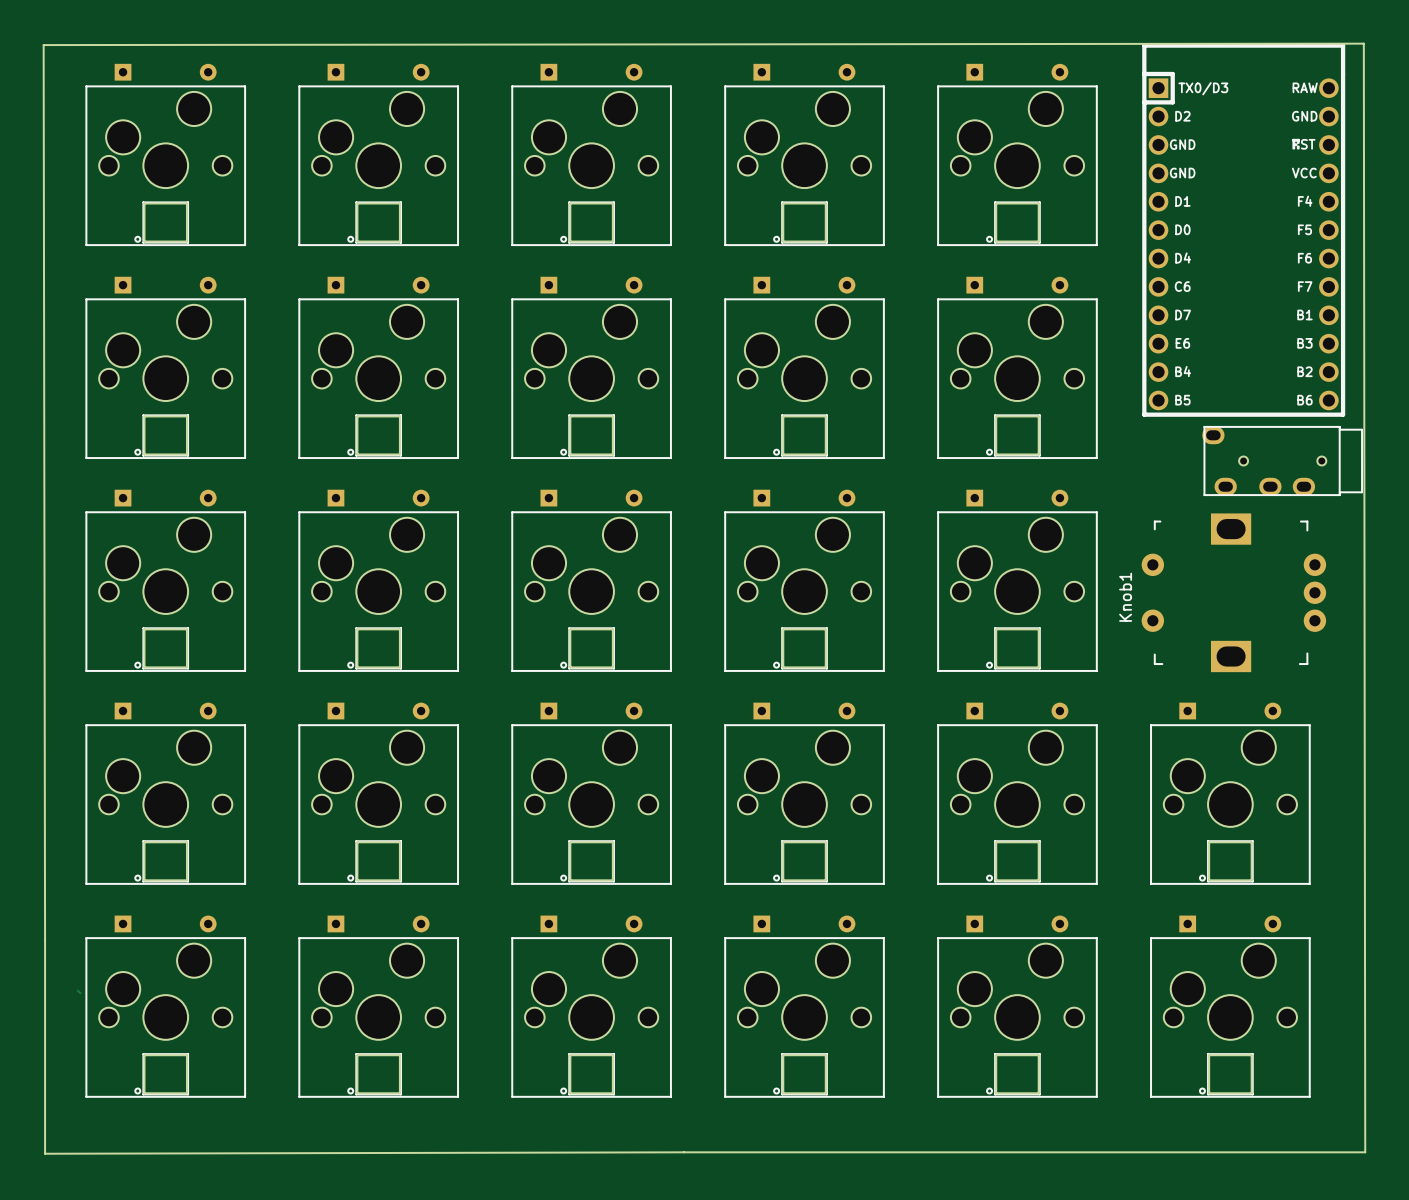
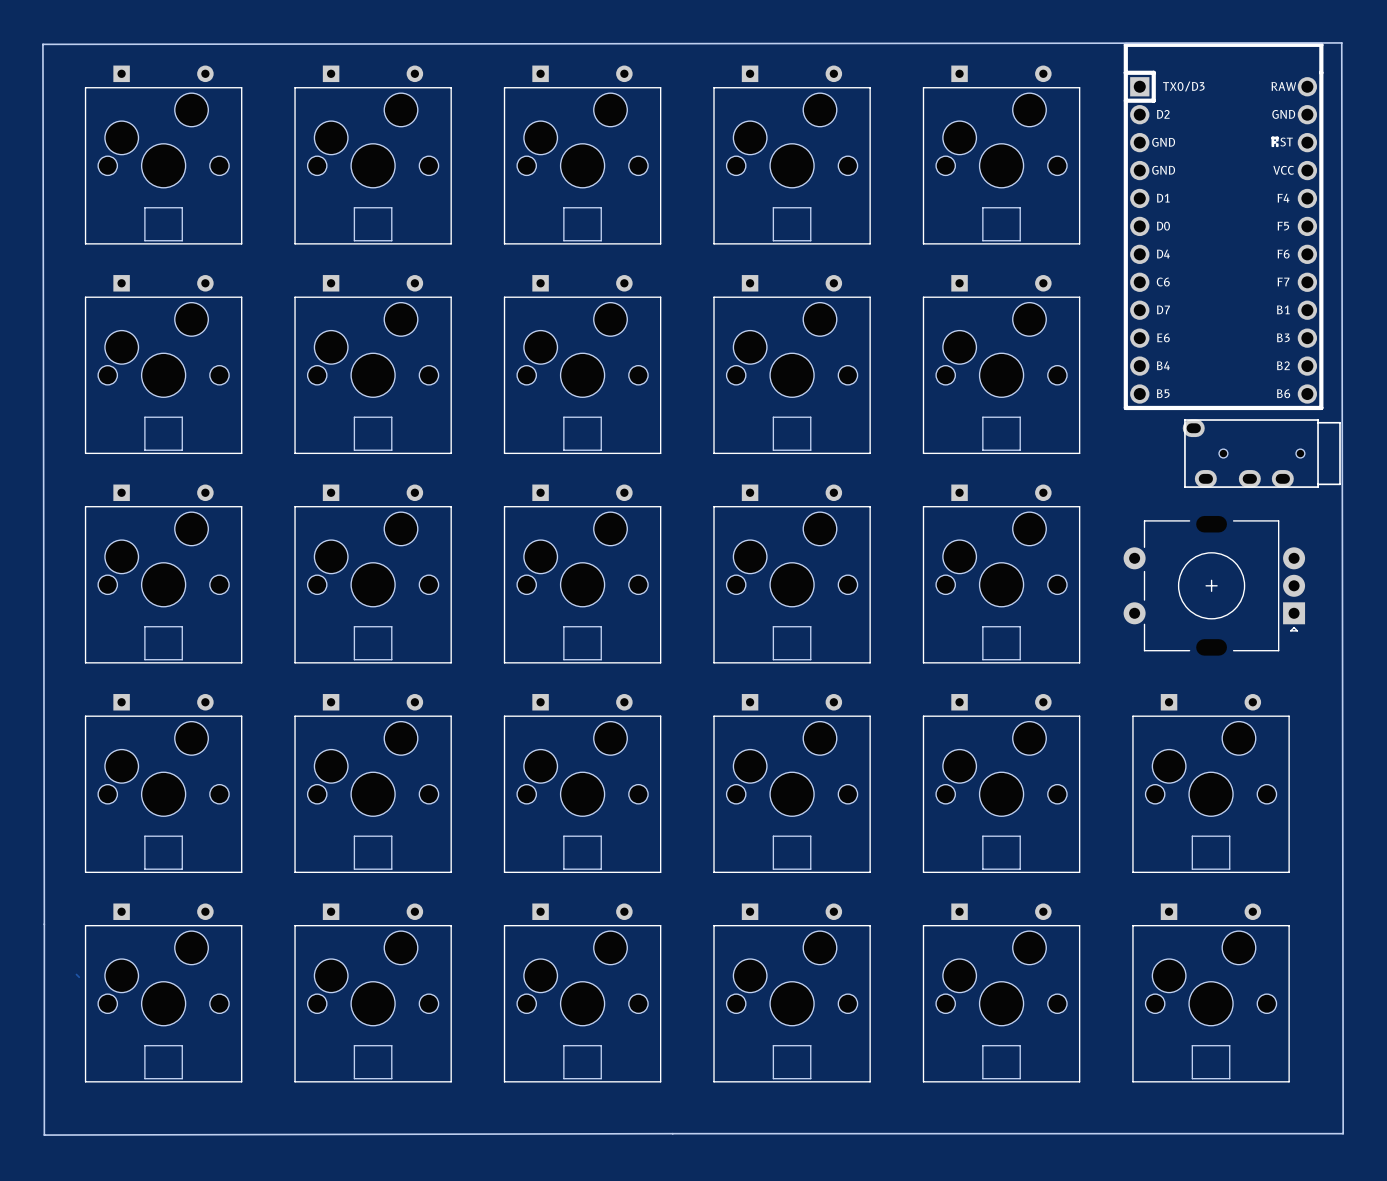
part footprint: [85, 63, 246, 246] -> [84, 65, 243, 245]
part footprint: [298, 63, 459, 246] -> [294, 65, 452, 245]
part footprint: [511, 63, 672, 246] -> [503, 65, 662, 245]
part footprint: [724, 63, 885, 246] -> [713, 65, 871, 245]
part footprint: [937, 63, 1098, 246] -> [922, 65, 1081, 245]
part footprint: [85, 276, 246, 459] -> [84, 275, 243, 455]
part footprint: [298, 276, 459, 459] -> [294, 275, 452, 455]
part footprint: [511, 276, 672, 459] -> [503, 275, 662, 455]
part footprint: [724, 276, 885, 459] -> [713, 275, 871, 455]
part footprint: [937, 276, 1098, 459] -> [922, 275, 1081, 455]
part footprint: [85, 489, 246, 672] -> [84, 484, 243, 664]
part footprint: [298, 489, 459, 672] -> [294, 484, 452, 664]
part footprint: [511, 489, 672, 672] -> [503, 484, 662, 664]
part footprint: [724, 489, 885, 672] -> [713, 484, 871, 664]
part footprint: [937, 489, 1098, 672] -> [922, 484, 1081, 664]
Knob1: (1233, 592) -> none
part: none -> (1214, 585)
part footprint: [85, 702, 246, 885] -> [84, 694, 243, 874]
part footprint: [298, 702, 459, 885] -> [294, 694, 452, 874]
part footprint: [511, 702, 672, 885] -> [503, 694, 662, 874]
part footprint: [724, 702, 885, 885] -> [713, 694, 871, 874]
part footprint: [937, 702, 1098, 885] -> [922, 694, 1081, 874]
part footprint: [1150, 702, 1311, 885] -> [1132, 694, 1290, 874]
part footprint: [85, 915, 246, 1098] -> [84, 903, 243, 1083]
part footprint: [298, 915, 459, 1098] -> [294, 903, 452, 1083]
part footprint: [511, 915, 672, 1098] -> [503, 903, 662, 1083]
part footprint: [724, 915, 885, 1098] -> [713, 903, 871, 1083]
part footprint: [937, 915, 1098, 1098] -> [922, 903, 1081, 1083]
part footprint: [1150, 915, 1311, 1098] -> [1132, 903, 1290, 1083]

